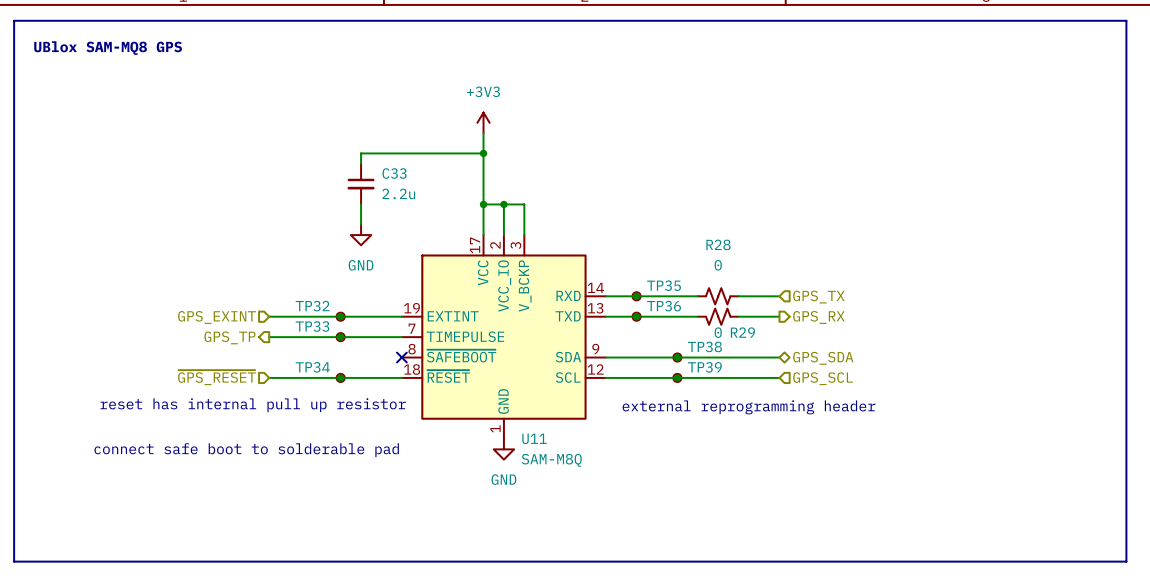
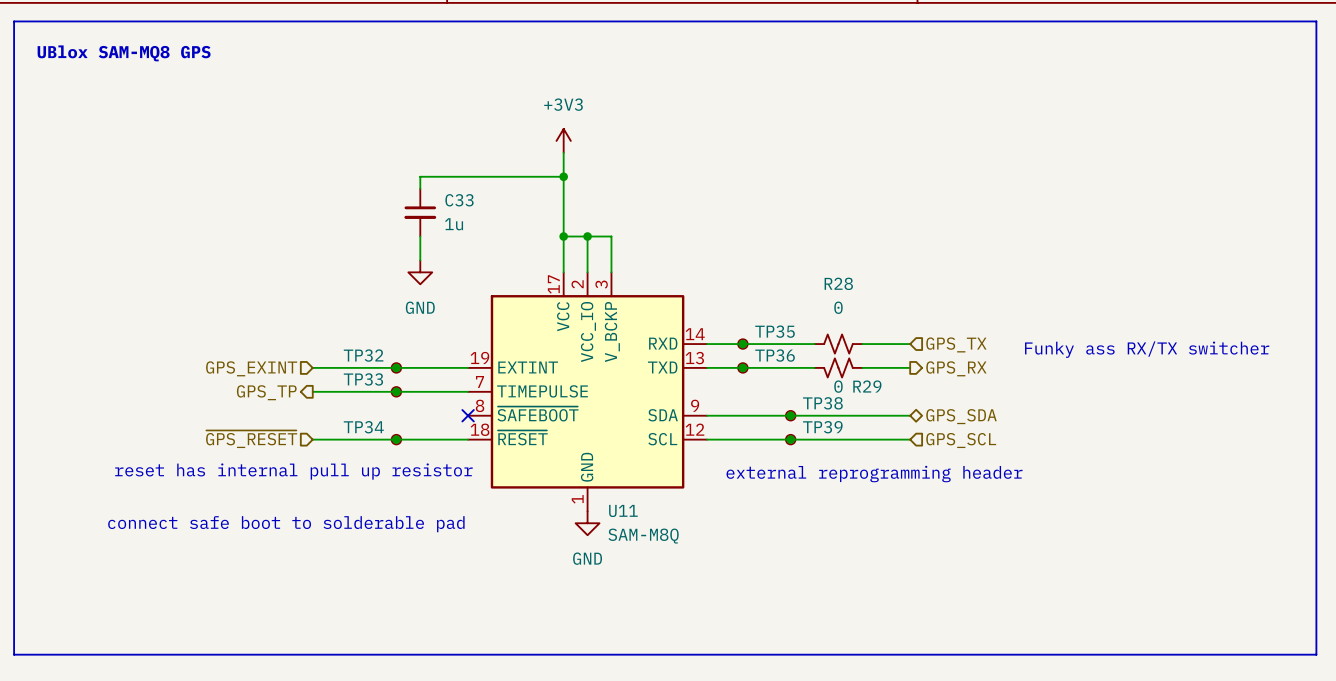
C33 value: 2.2u (398, 193) -> 1u (454, 224)
text: none -> Funky ass RX/TX switcher (1147, 349)

